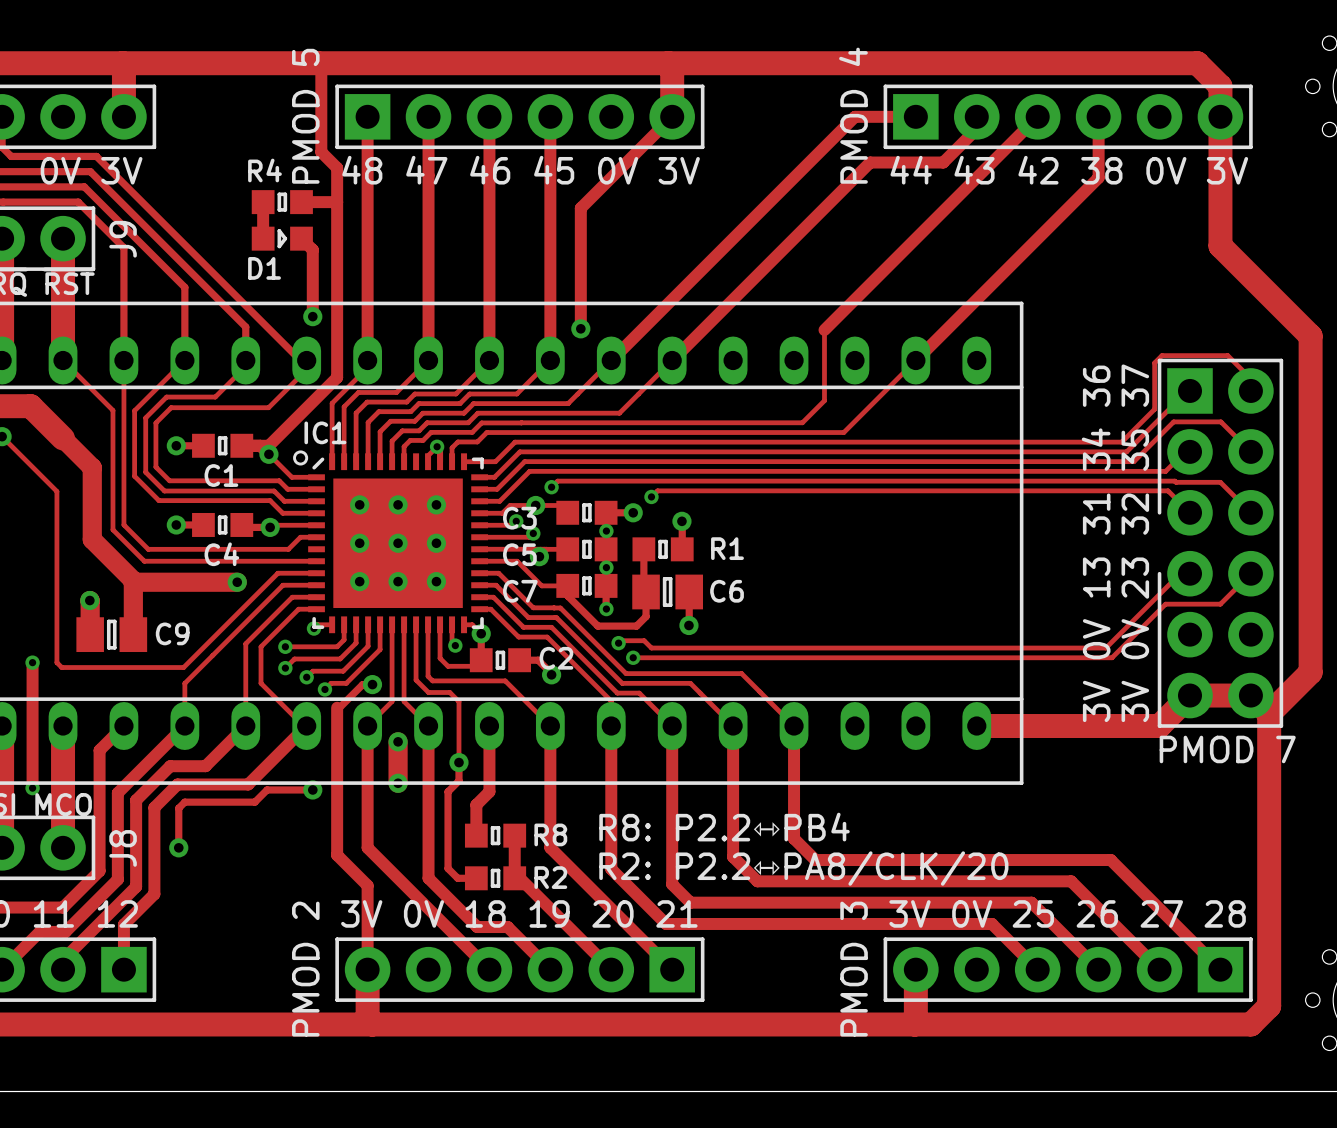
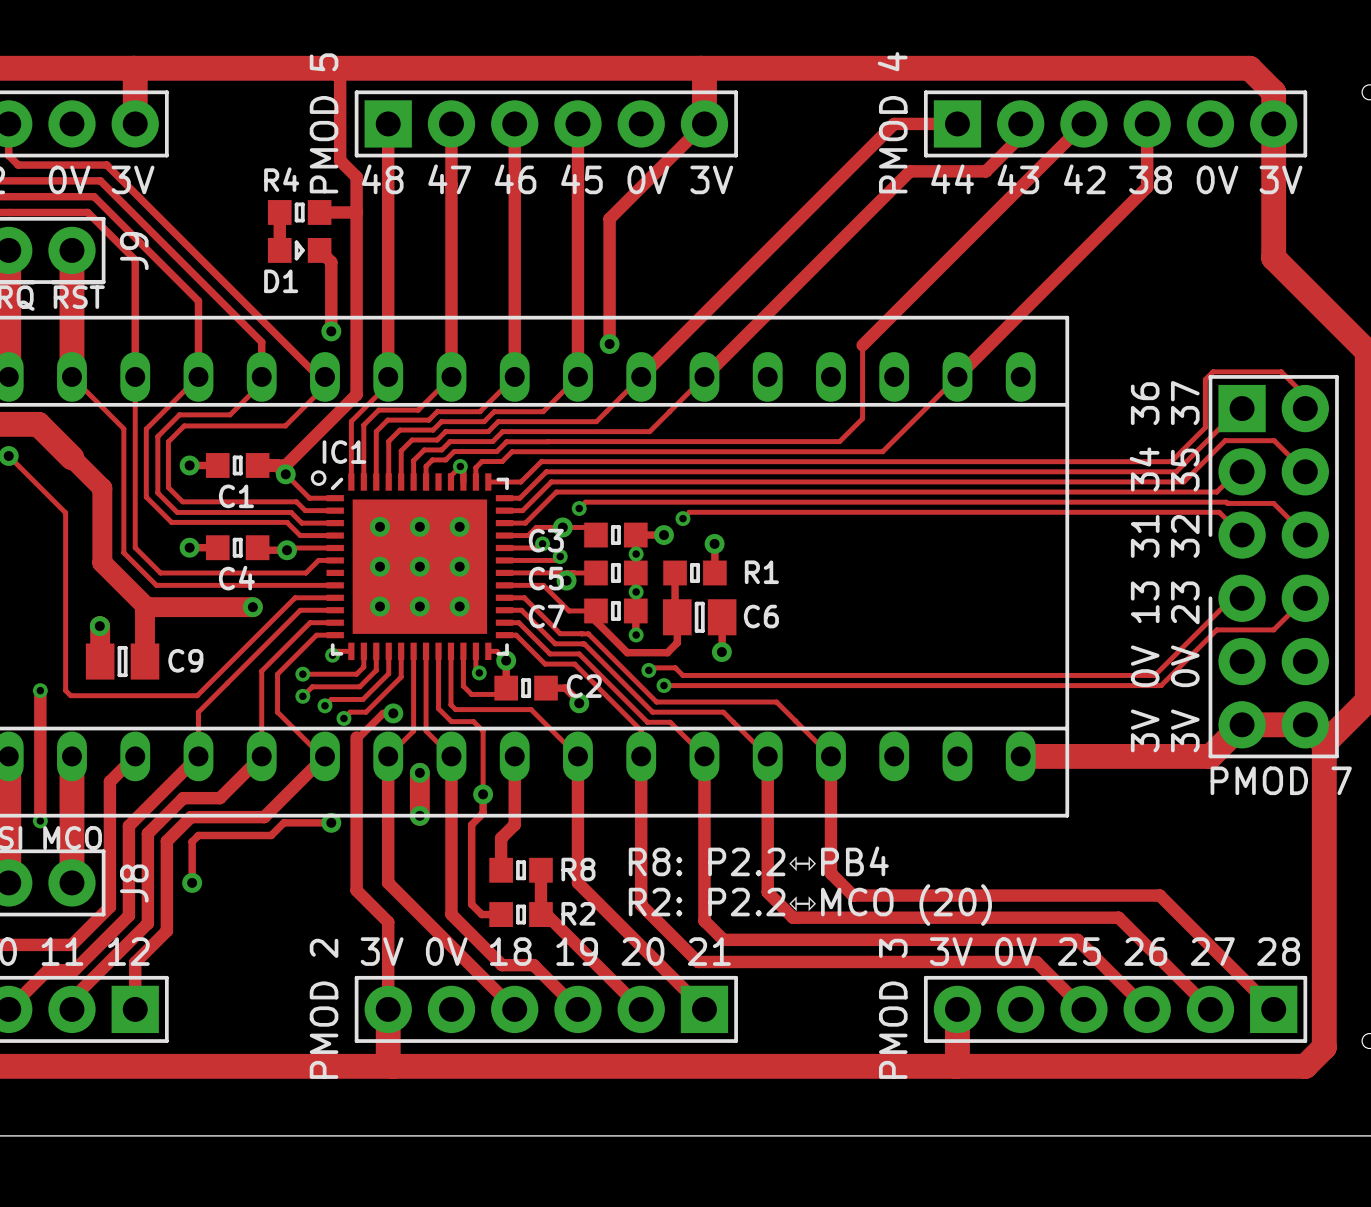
text: R2: P2.2⇿PA8/CLK/20 (803, 868) -> R2: P2.2⇿MCO (20) (810, 904)

